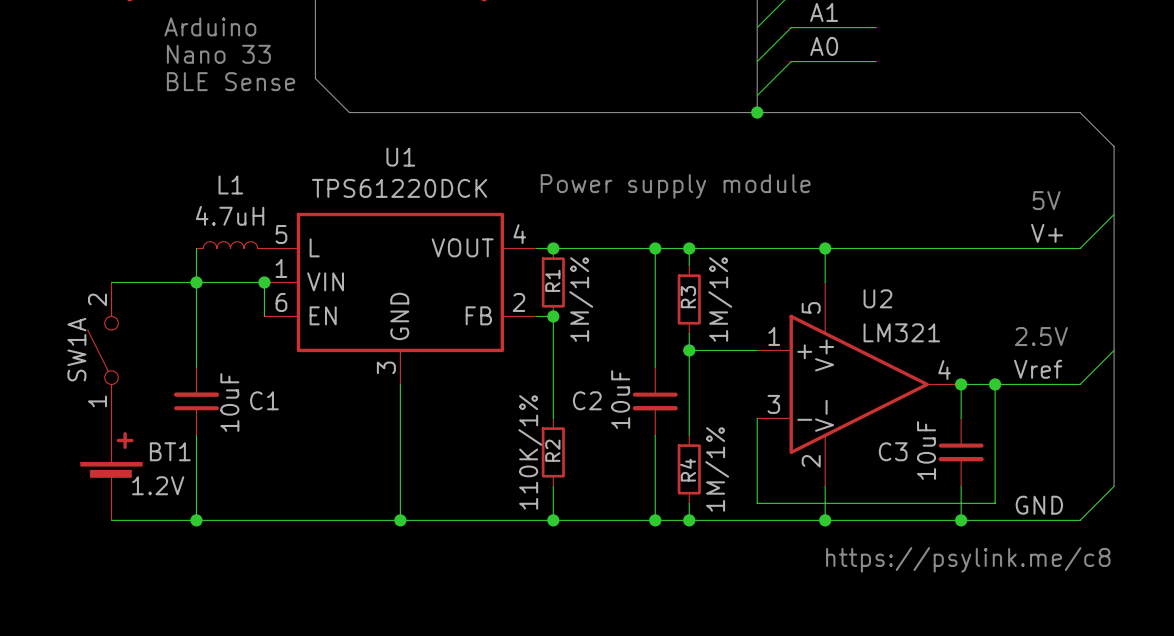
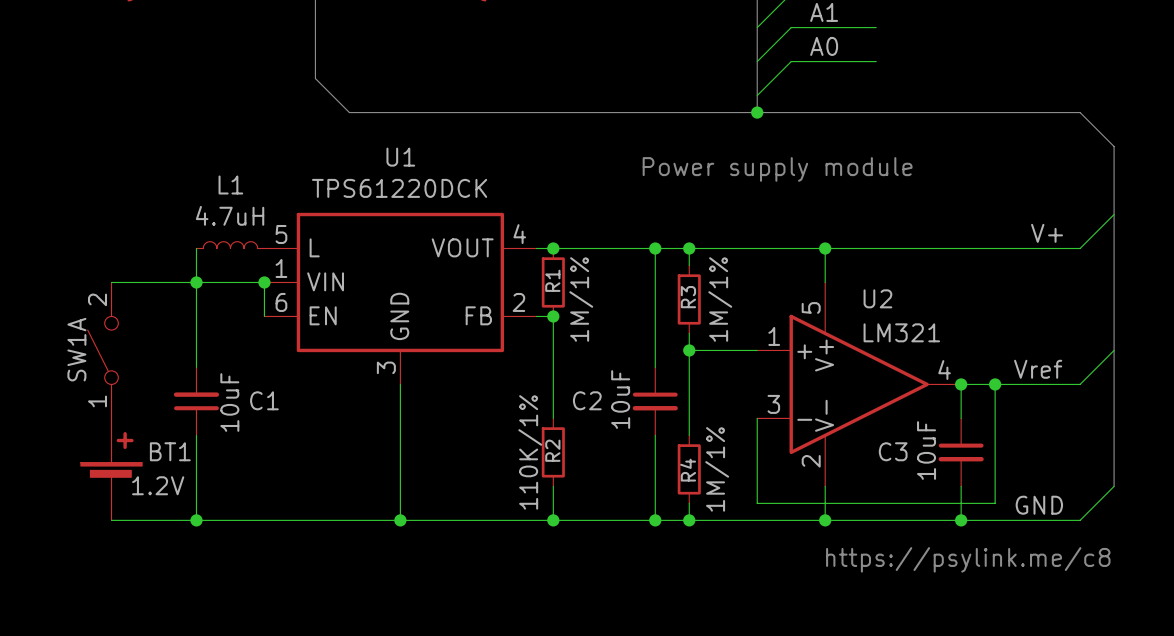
text: Arduino (210, 26) -> none
text: Nano 33 (218, 54) -> none
text: BLE Sense (231, 81) -> none
text position: Power supply module (675, 186) -> Power supply module (777, 169)
text: 5V (1046, 200) -> none
text: 2.5V (1041, 336) -> none

